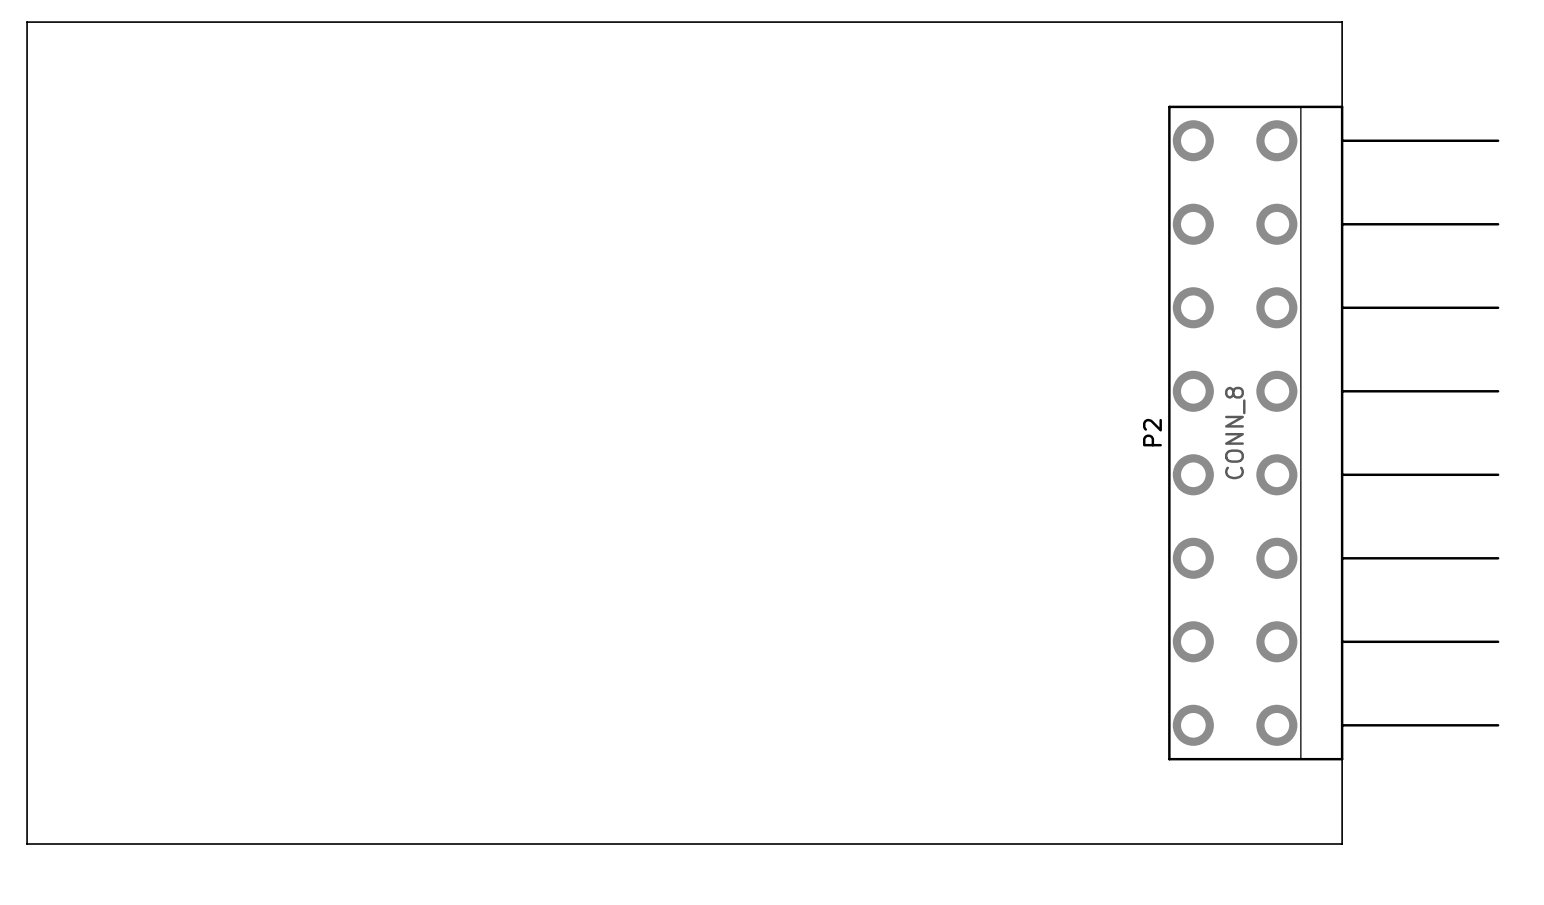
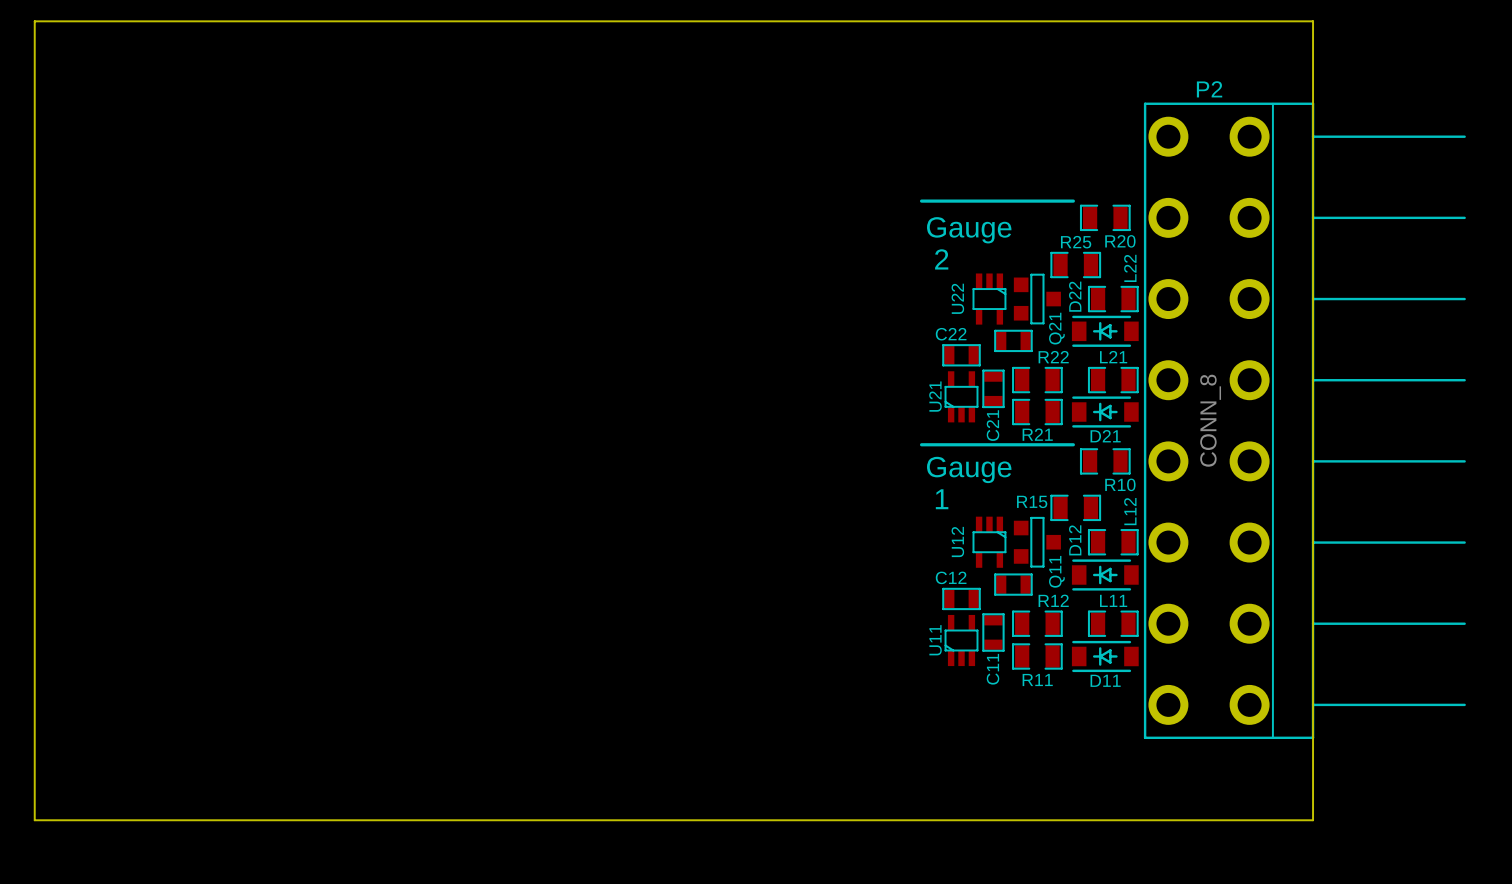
line: none -> (921, 201) (1073, 201)
R20: none -> (1105, 217)
text: none -> Gauge (969, 230)
text: none -> 2 (941, 259)
R25: none -> (1075, 265)
U22: none -> (989, 299)
Q21: none -> (1037, 299)
L22: none -> (1113, 299)
D22: none -> (1105, 331)
part: none -> (1013, 340)
C22: none -> (961, 355)
R22: none -> (1037, 380)
L21: none -> (1113, 380)
C21: none -> (993, 388)
U21: none -> (961, 396)
R21: none -> (1037, 412)
D21: none -> (1105, 412)
P2 name rotation: 0° (1152, 432) -> 90° clockwise (1209, 89)
P2 name position: P2 (1152, 432) -> P2 (1209, 89)
line: none -> (921, 444) (1073, 444)
R10: none -> (1105, 461)
text: none -> Gauge (969, 469)
text: none -> 1 (942, 499)
R15: none -> (1075, 507)
U12: none -> (989, 542)
Q11: none -> (1037, 542)
L12: none -> (1113, 542)
D12: none -> (1105, 574)
part: none -> (1013, 584)
C12: none -> (961, 598)
R12: none -> (1037, 623)
L11: none -> (1113, 623)
C11: none -> (993, 632)
U11: none -> (961, 640)
R11: none -> (1037, 656)
D11: none -> (1105, 656)

